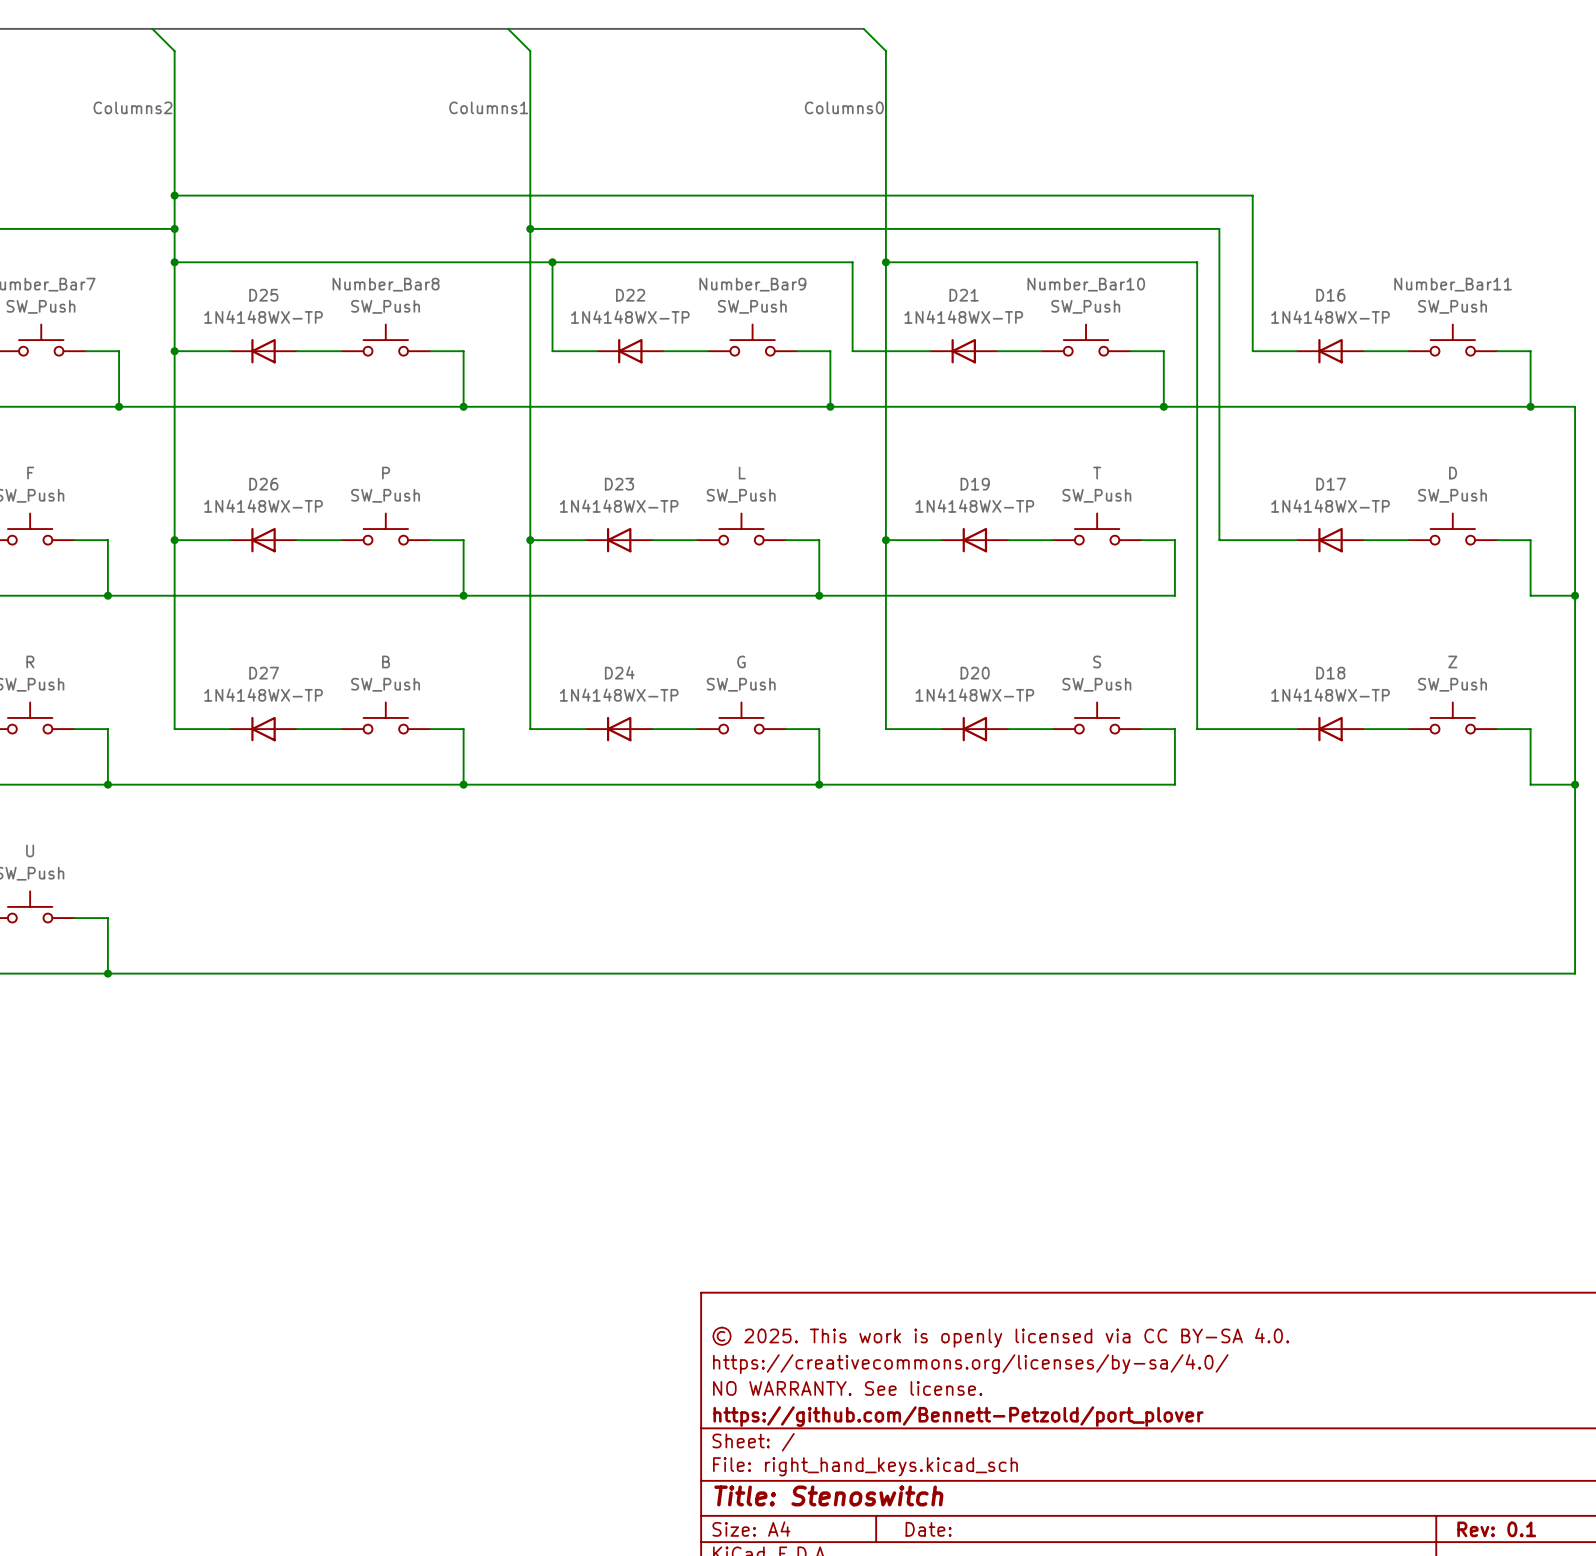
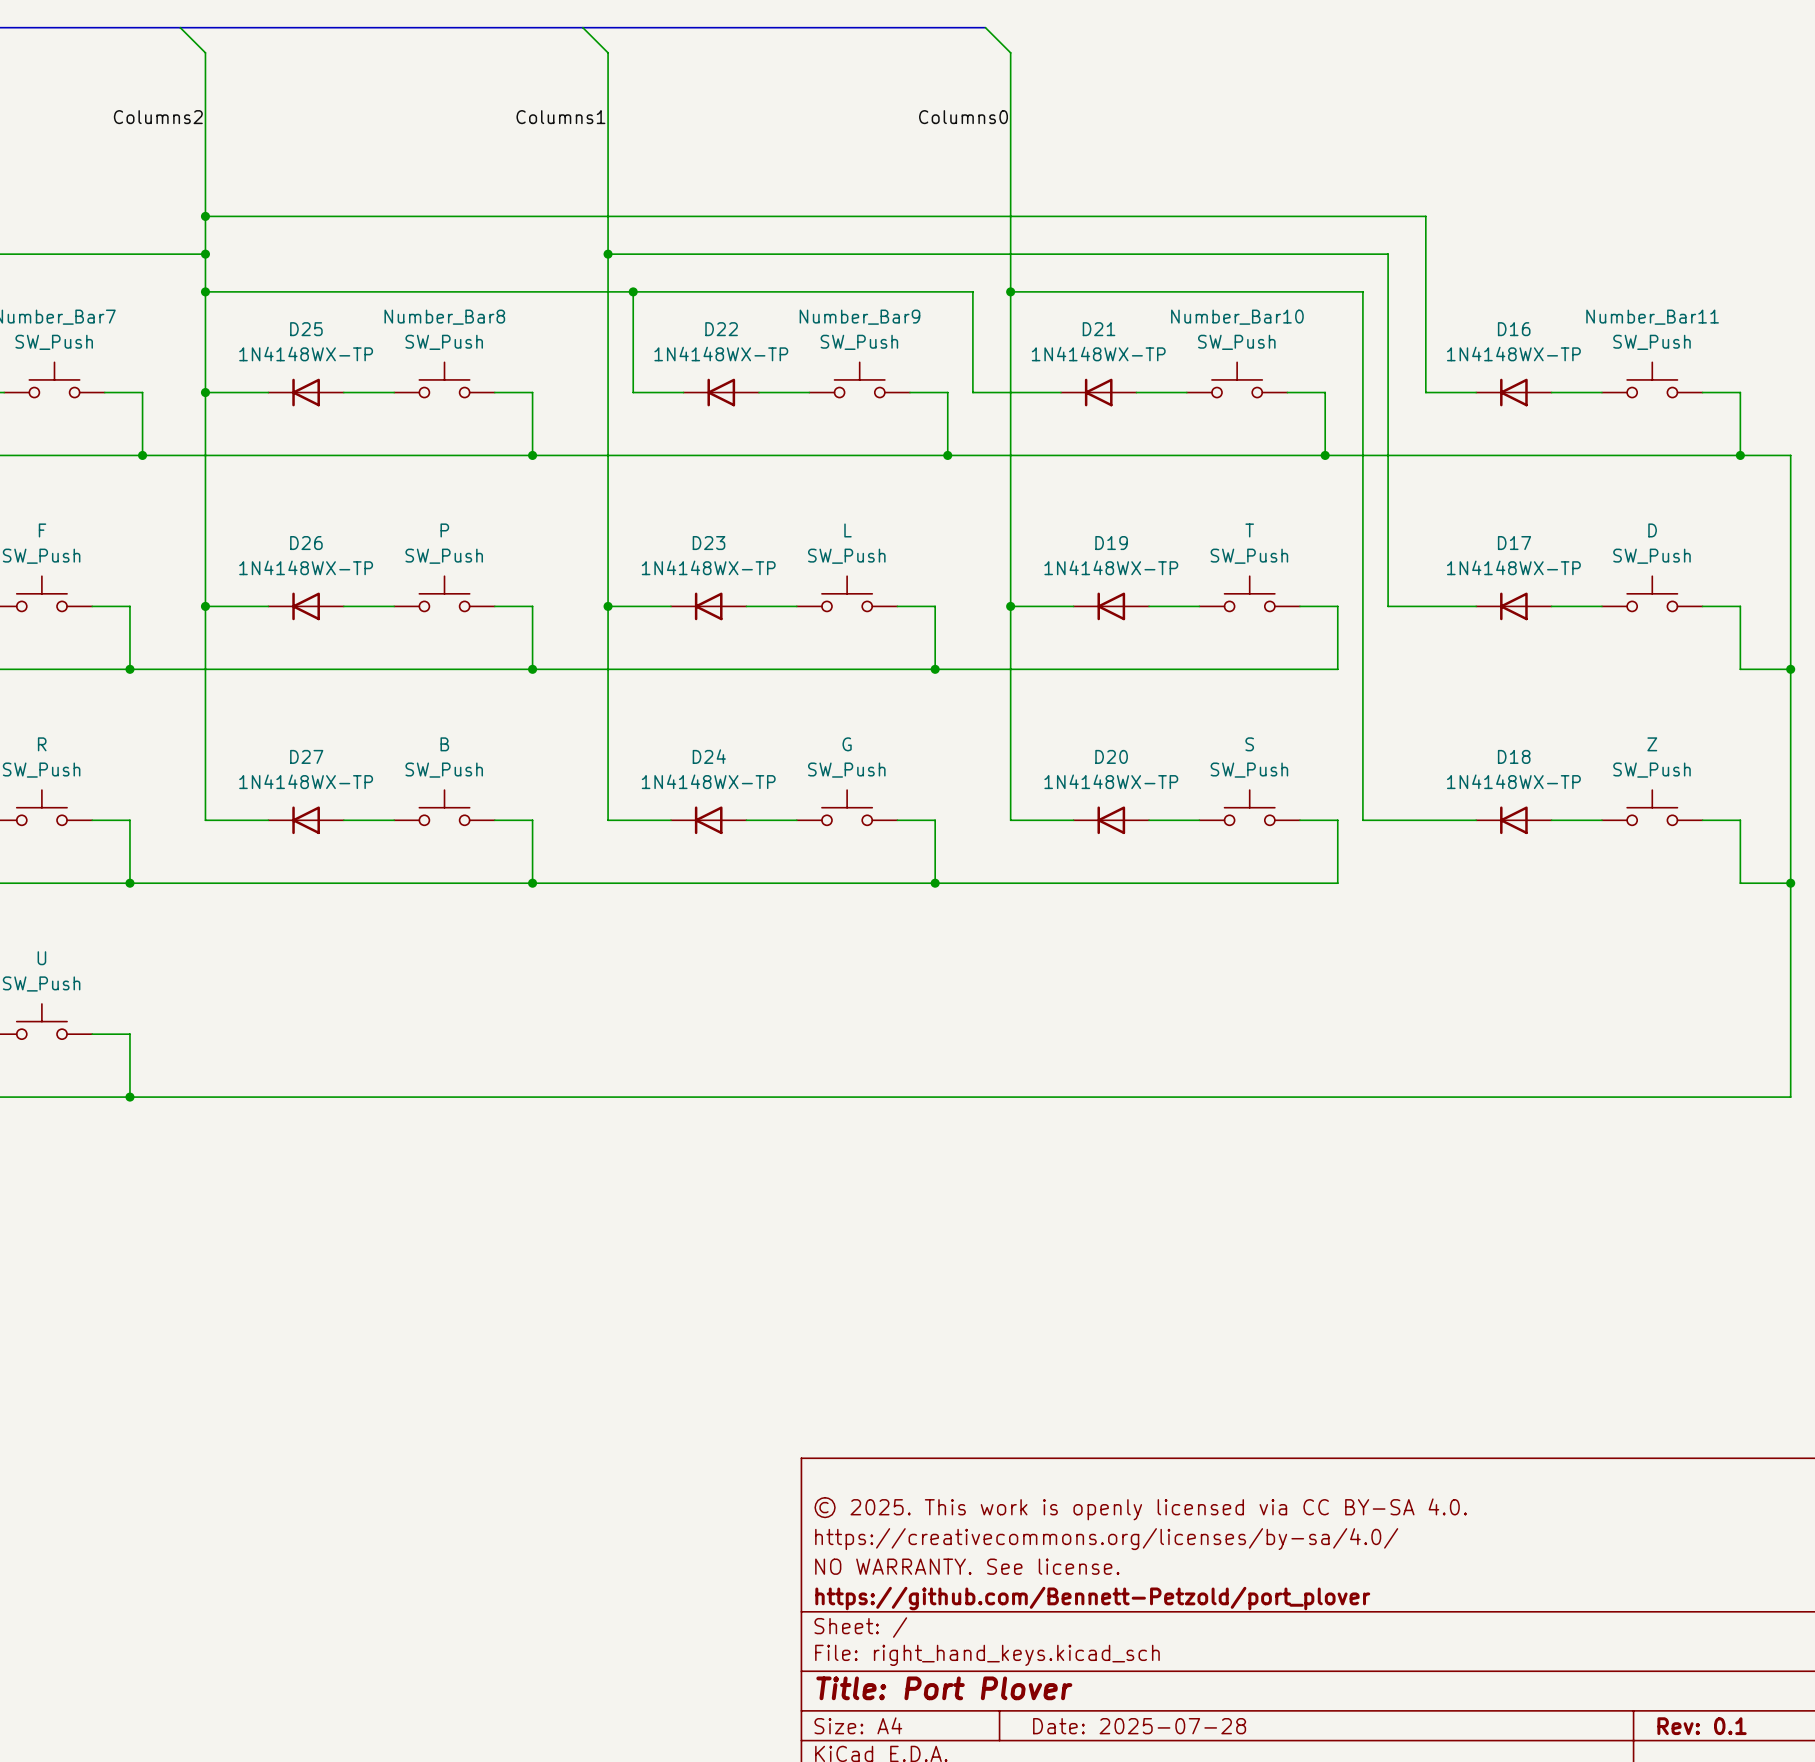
title block: Title: Stenoswitch (828, 1495) -> Title: Port Plover (944, 1688)
title block: Date: (928, 1529) -> Date: 2025-07-28 (1139, 1726)

